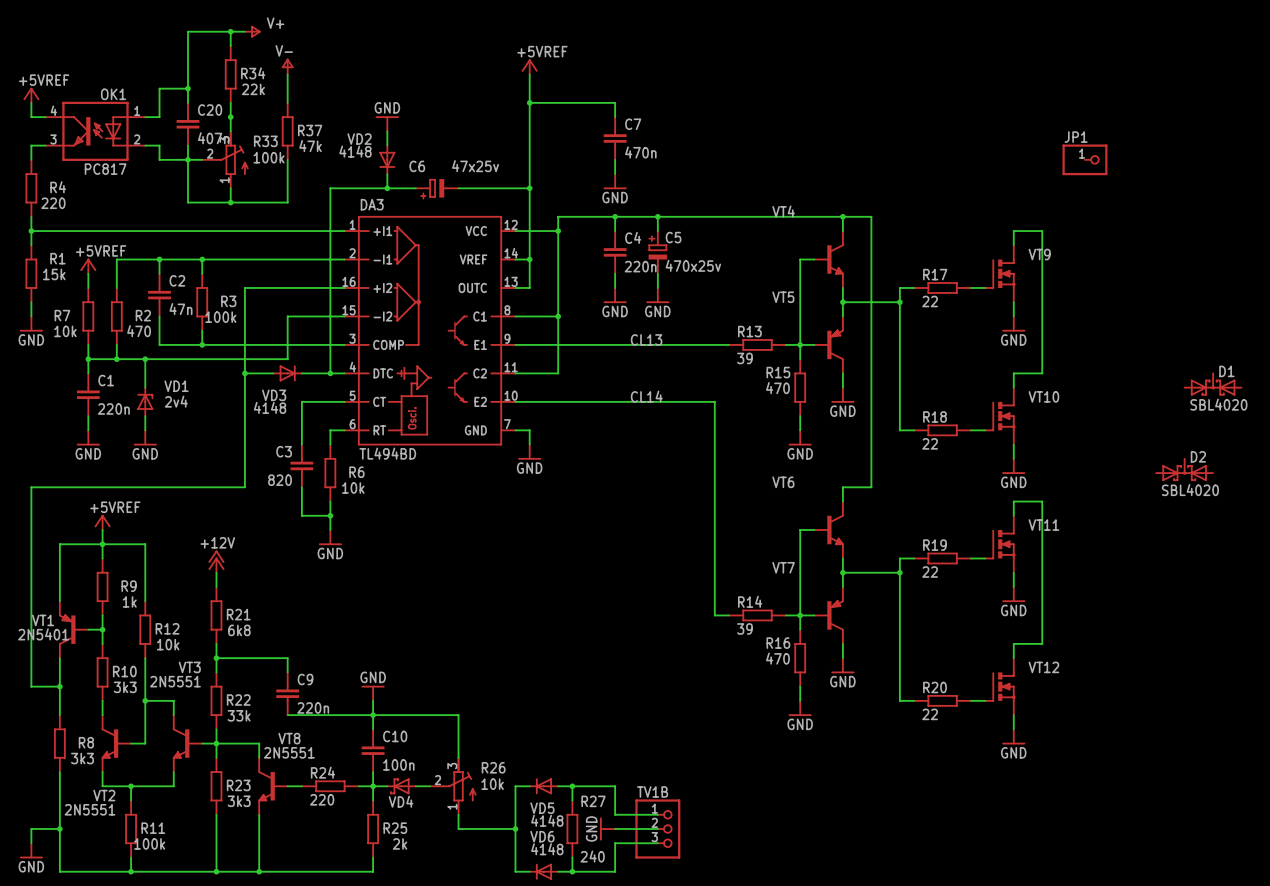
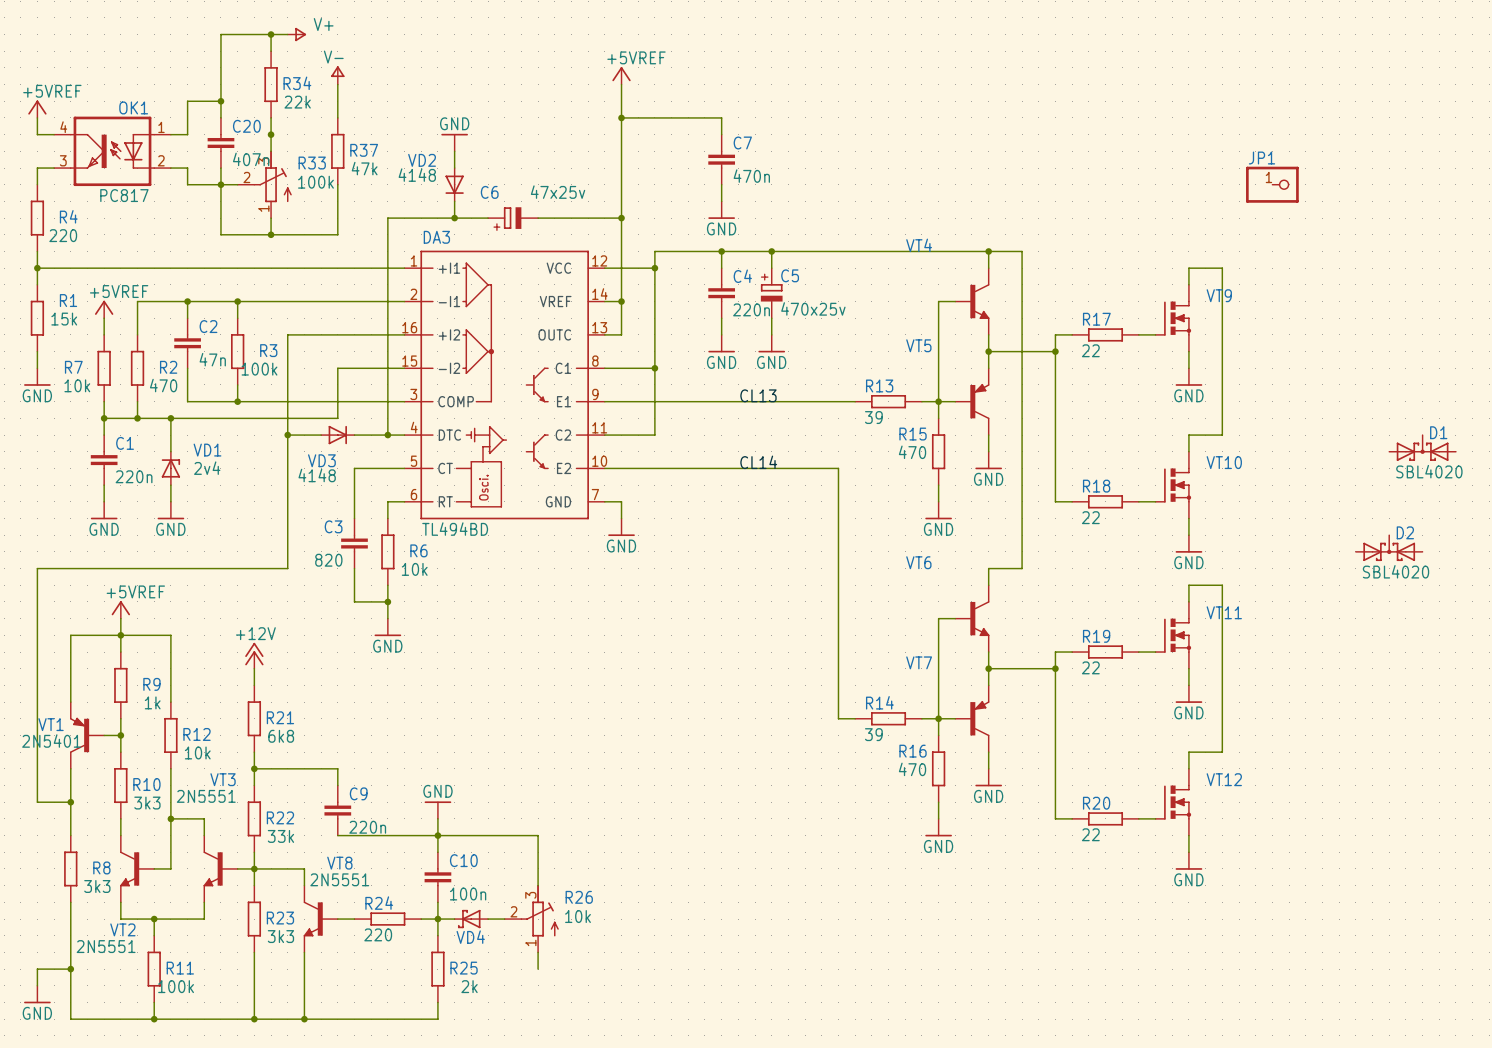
wire: (529, 786) (515, 786) (515, 871) (529, 871) -> none
VD5: 4148 (543, 786) -> none
wire: (558, 786) (615, 786) (615, 814) (657, 814) -> none
wire: (572, 786) (572, 800) -> none
junction: (572, 786) -> none
wire: (458, 829) (515, 829) -> none
junction: (515, 829) -> none
R27: 240 (572, 829) -> none
power symbol: GND (607, 829) -> none
wire: (615, 829) (657, 829) -> none
TV1B: (657, 829) -> none
wire: (657, 843) (615, 843) (615, 871) (558, 871) -> none
wire: (572, 857) (572, 871) -> none
VD6: 4148 (543, 871) -> none
junction: (572, 871) -> none

